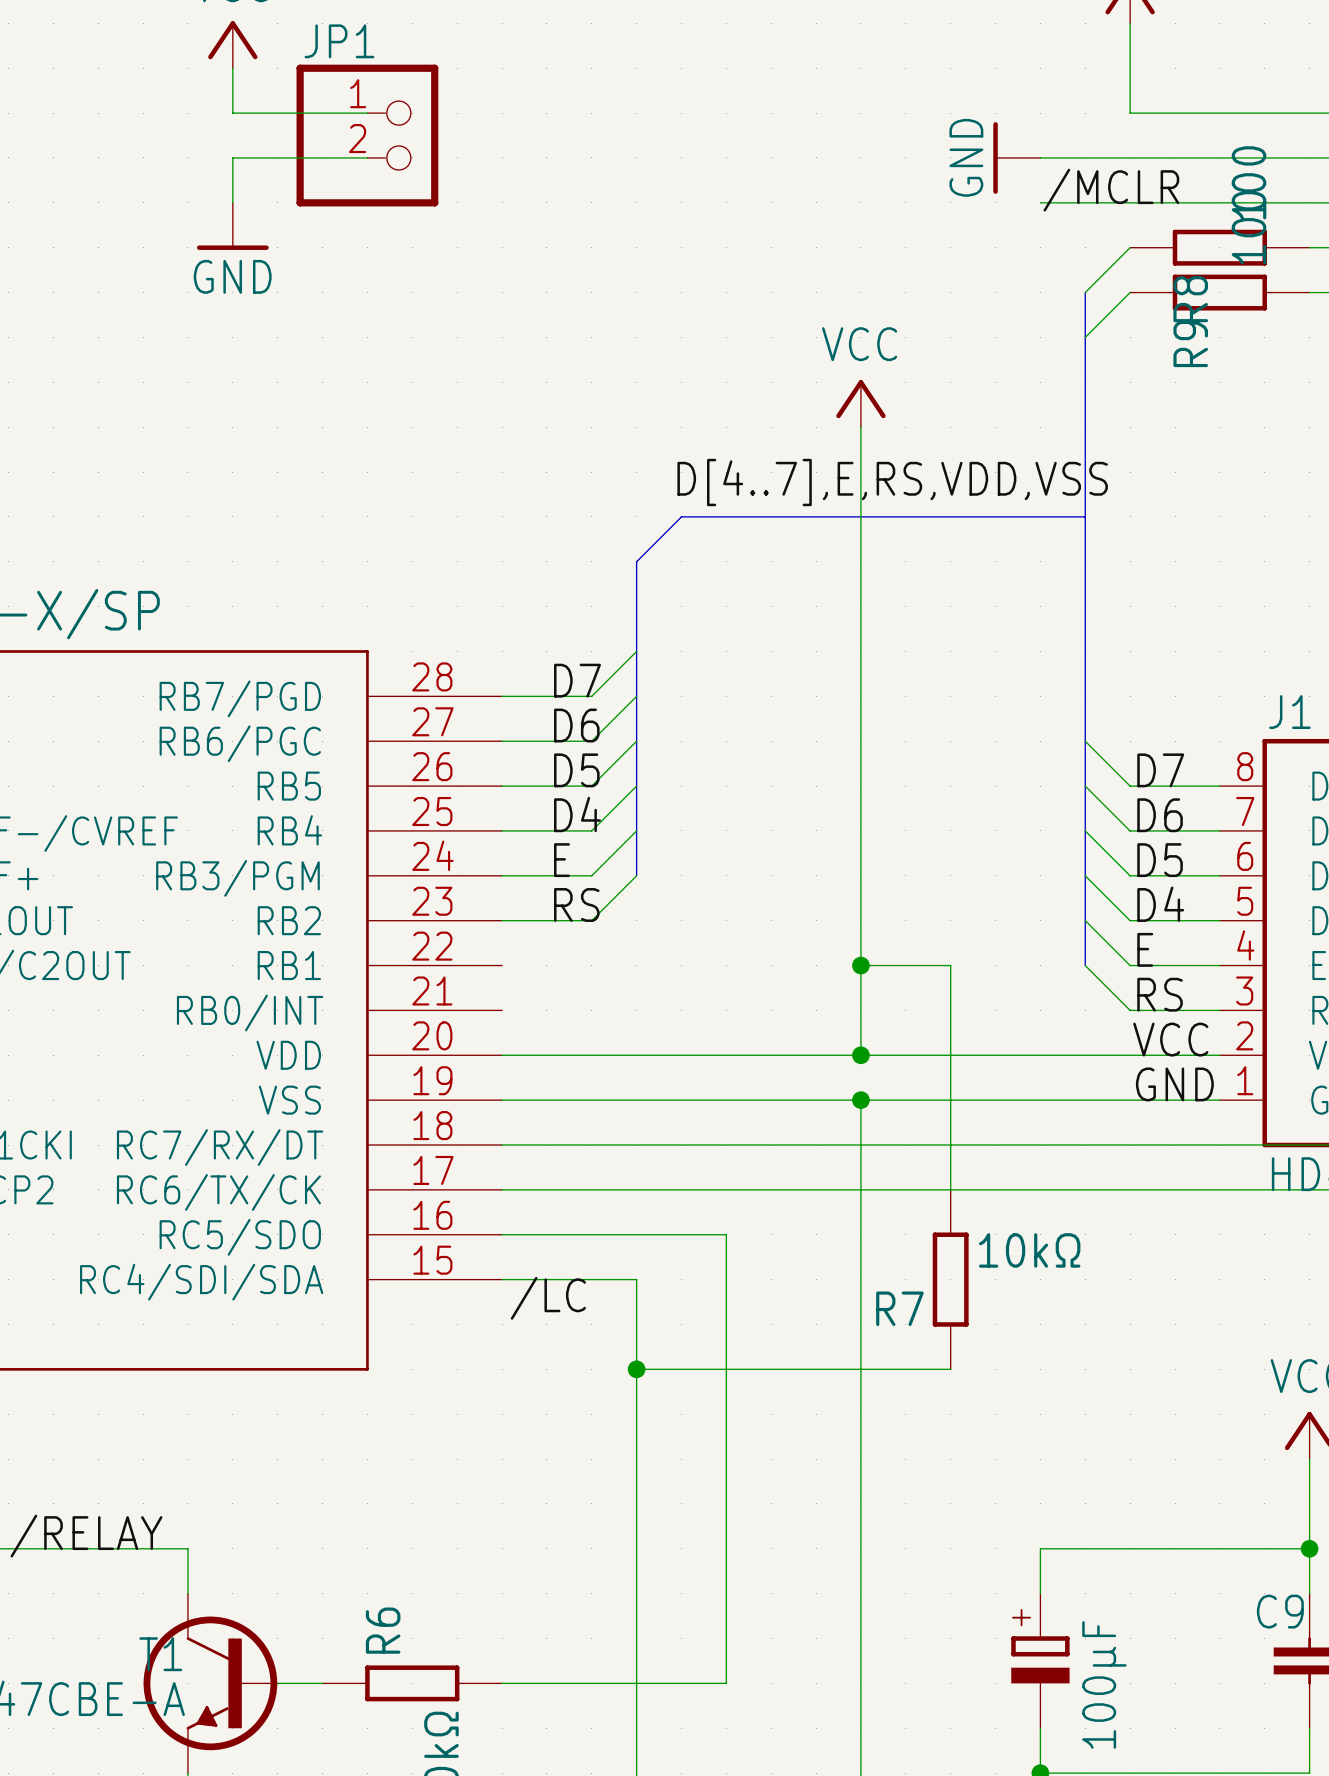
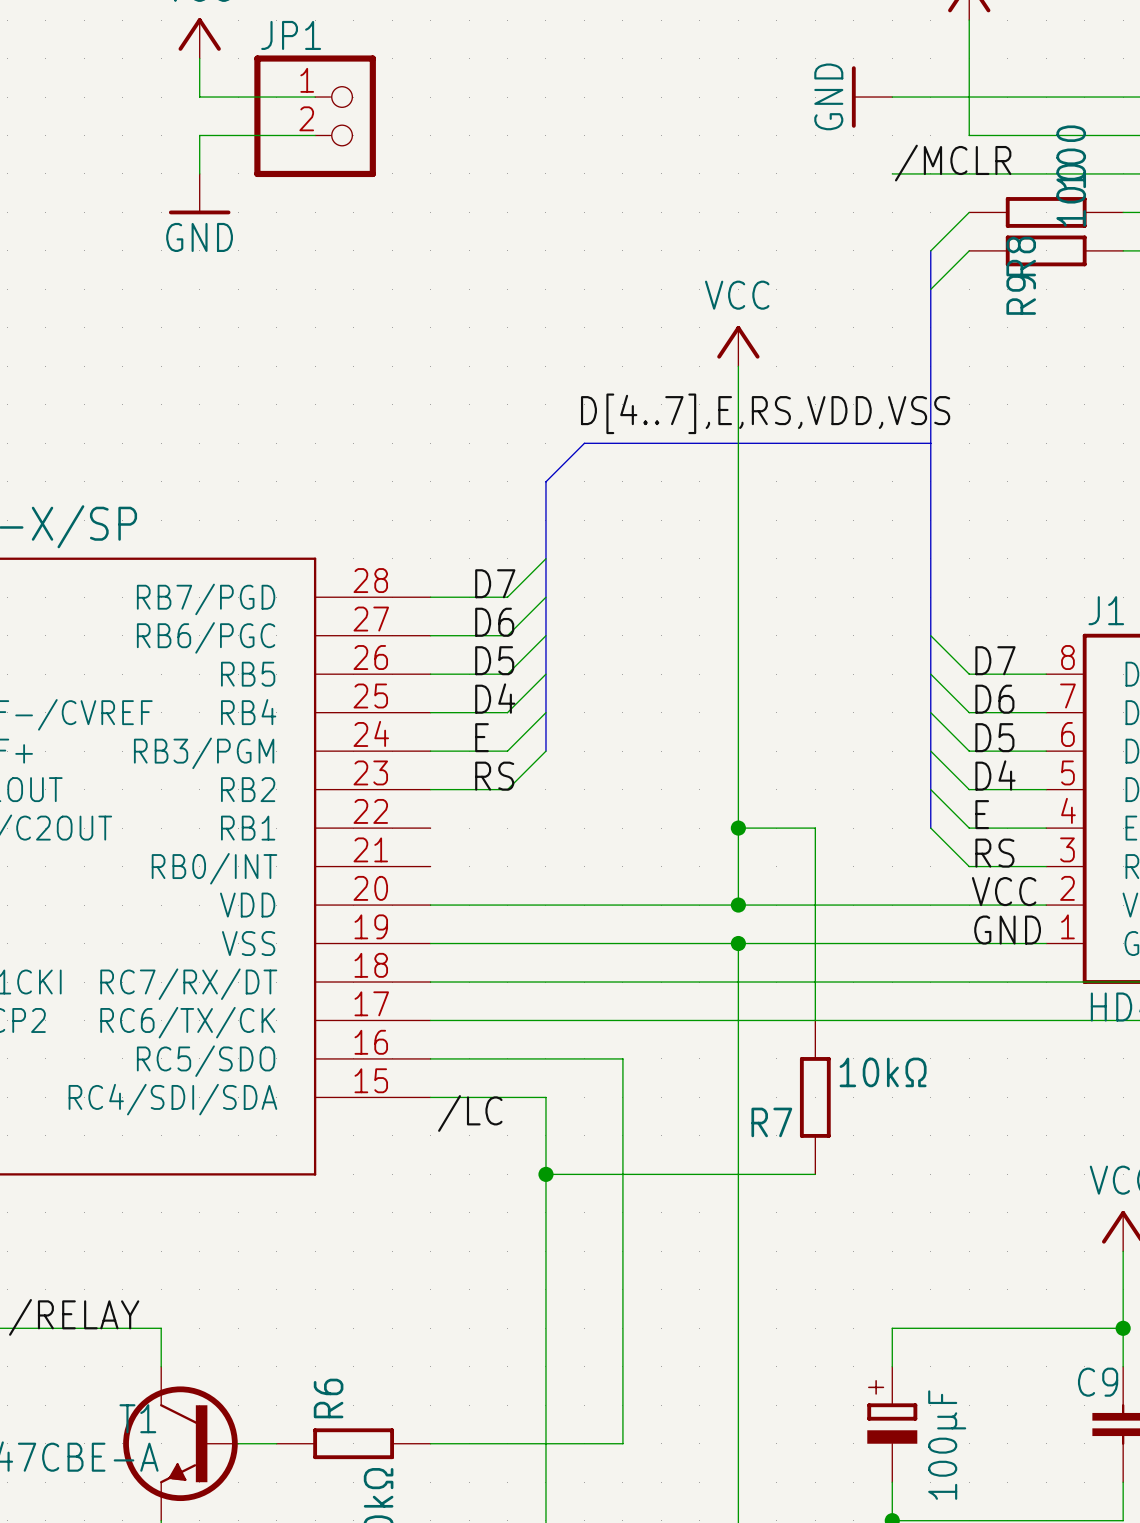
power symbol position: GND (1016, 157) -> GND (872, 97)
wire: (1040, 157) (1130, 157) -> (892, 97) (969, 97) (969, 135)

